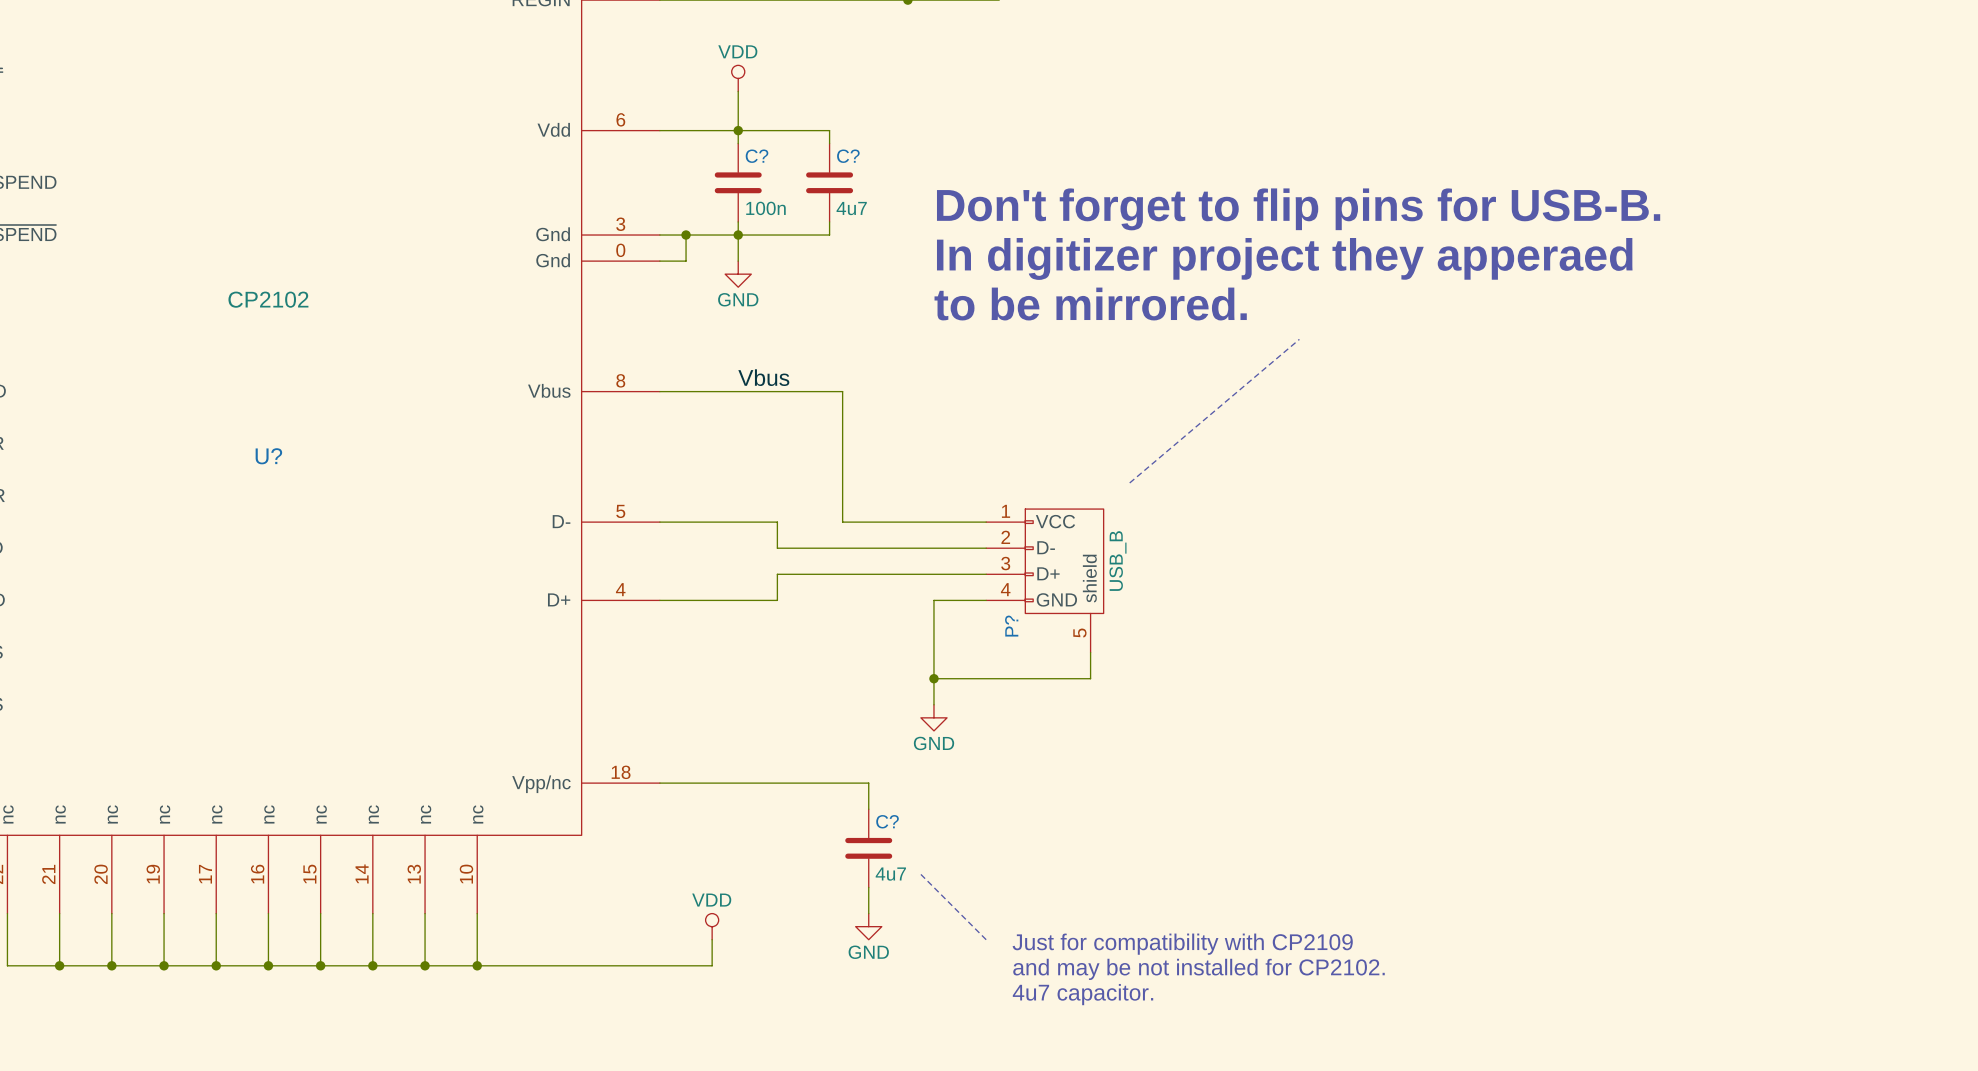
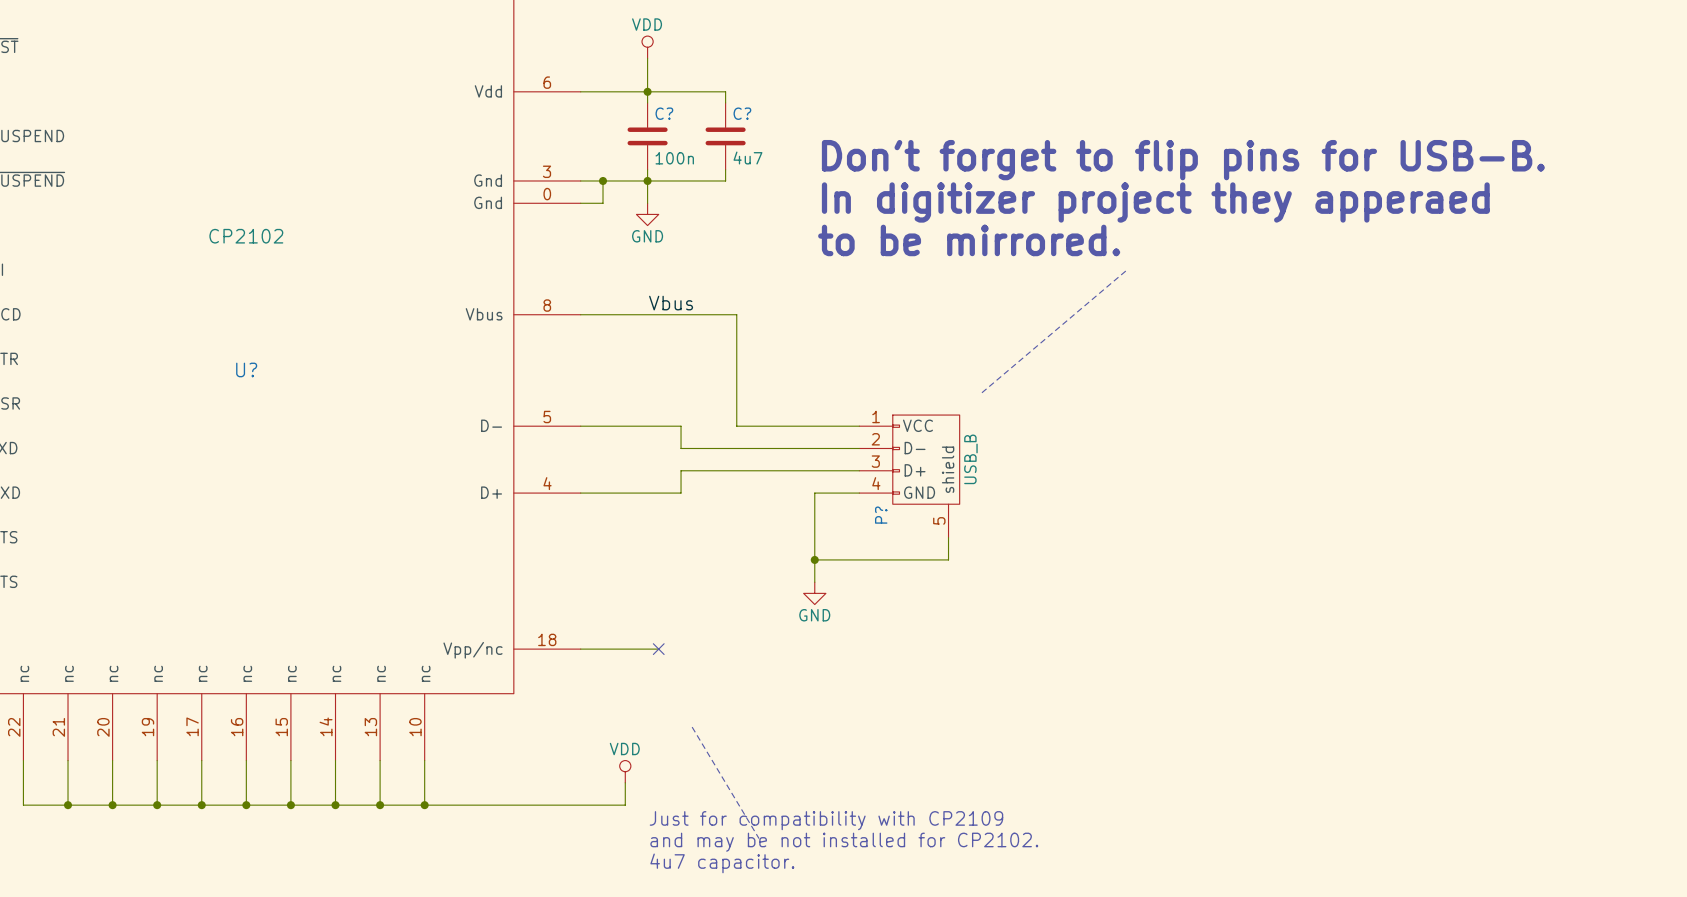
wire: (751, 783) (868, 783) (868, 809) -> none
no-connect mark: none -> (658, 649)
C?: 4u7 (868, 848) -> none
line: none -> (692, 727) (759, 838)
line: (920, 874) (986, 939) -> none
wire: (868, 887) (868, 913) -> none
power symbol: GND (868, 926) -> none
text: Just for compatibility with CP2109 (1182, 944) -> none
text: and may be not installed for CP2102. (1199, 969) -> none
text: none -> Just for compatibility with CP2109 (826, 820)
text: 4u7 capacitor. (1083, 994) -> none
text: none -> and may be not installed for CP2102. (844, 842)
text: none -> 4u7 capacitor. (722, 863)

